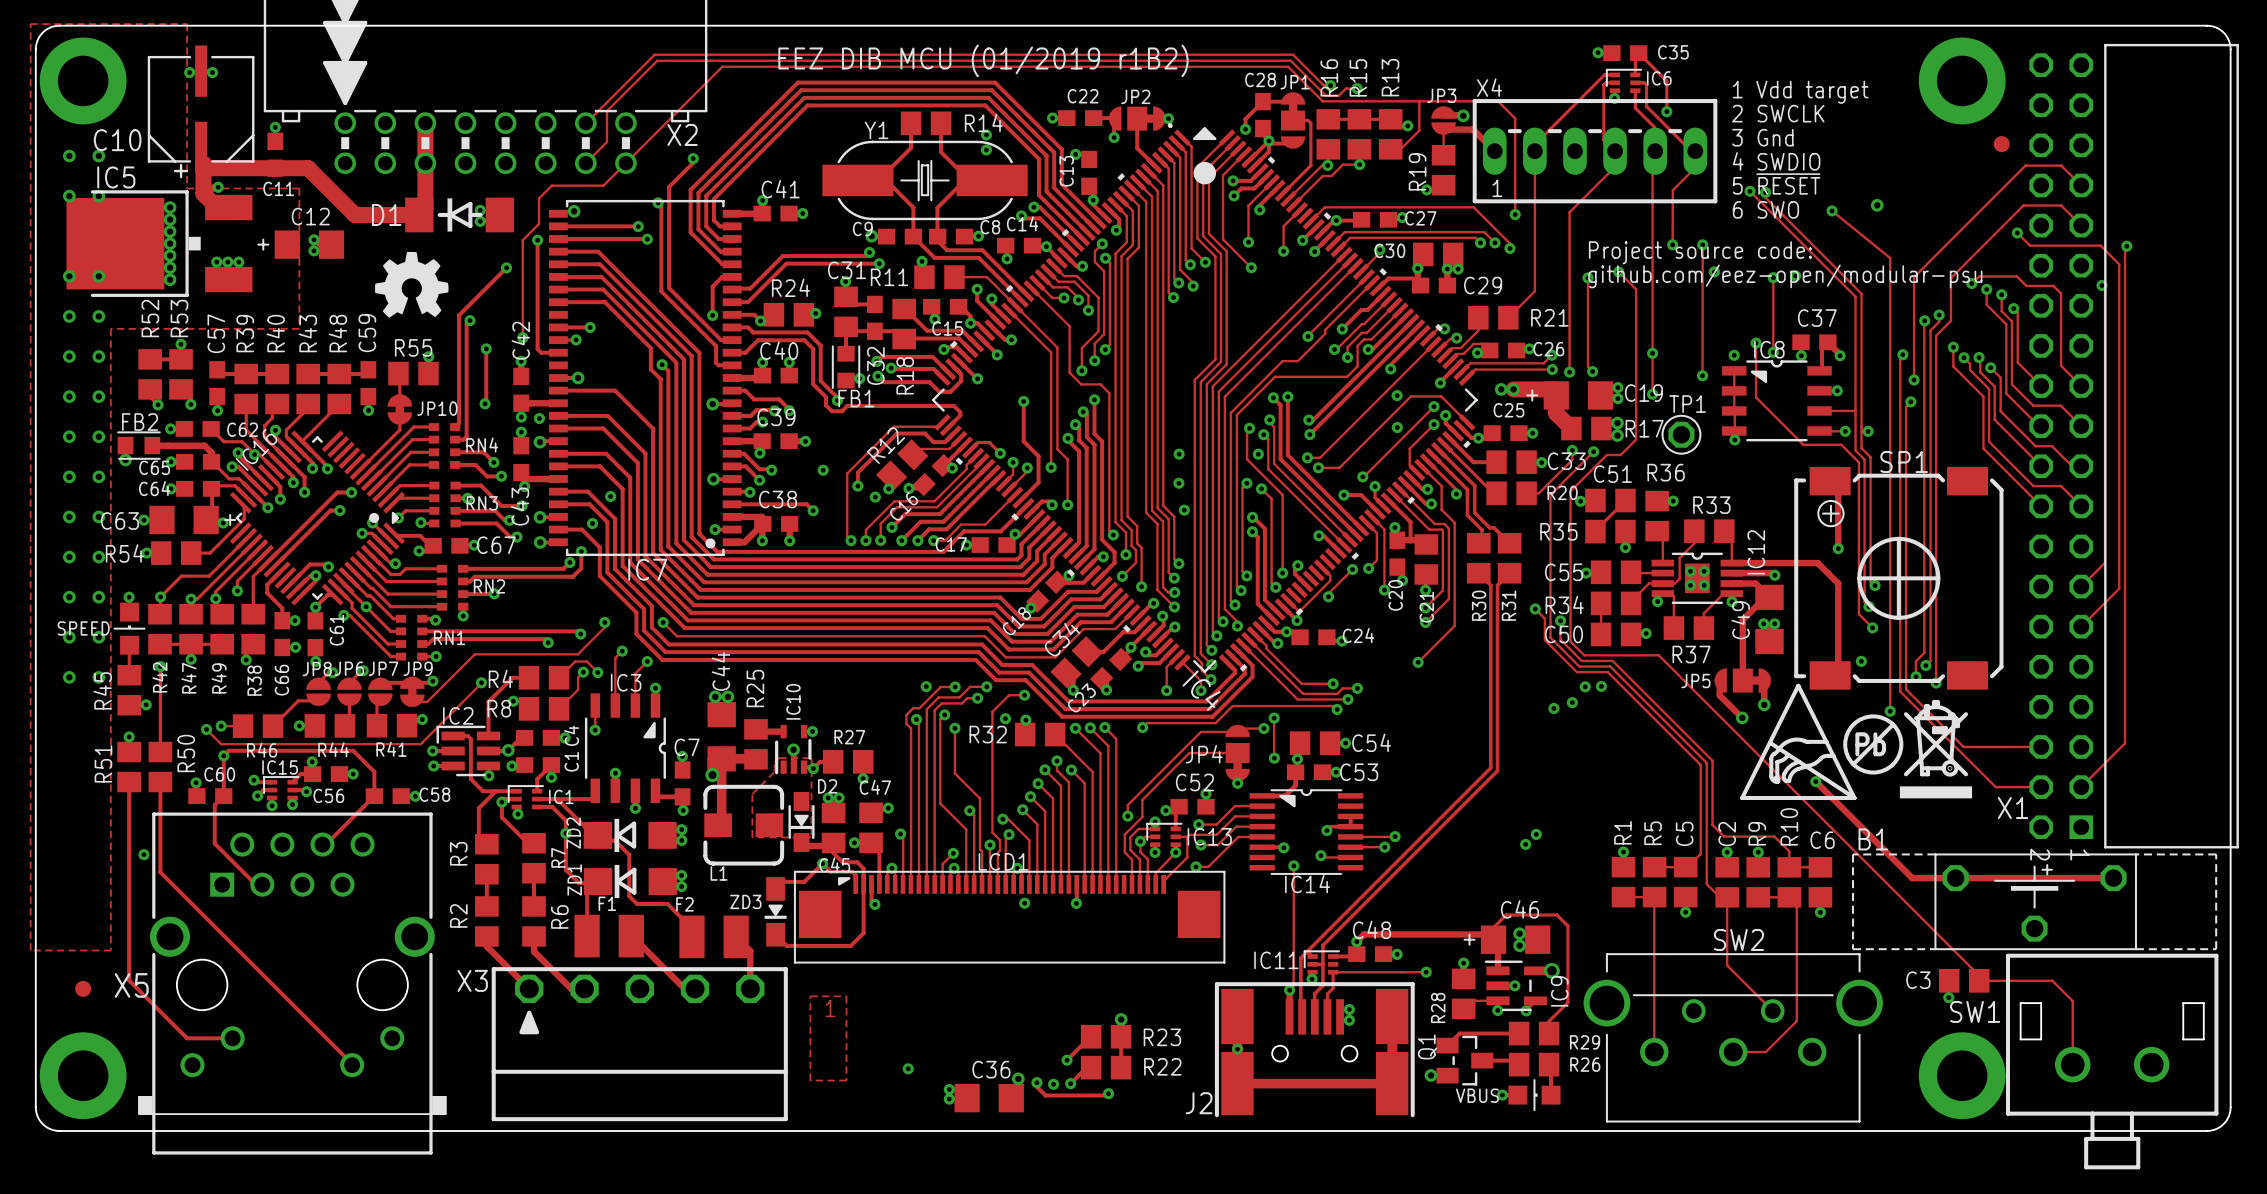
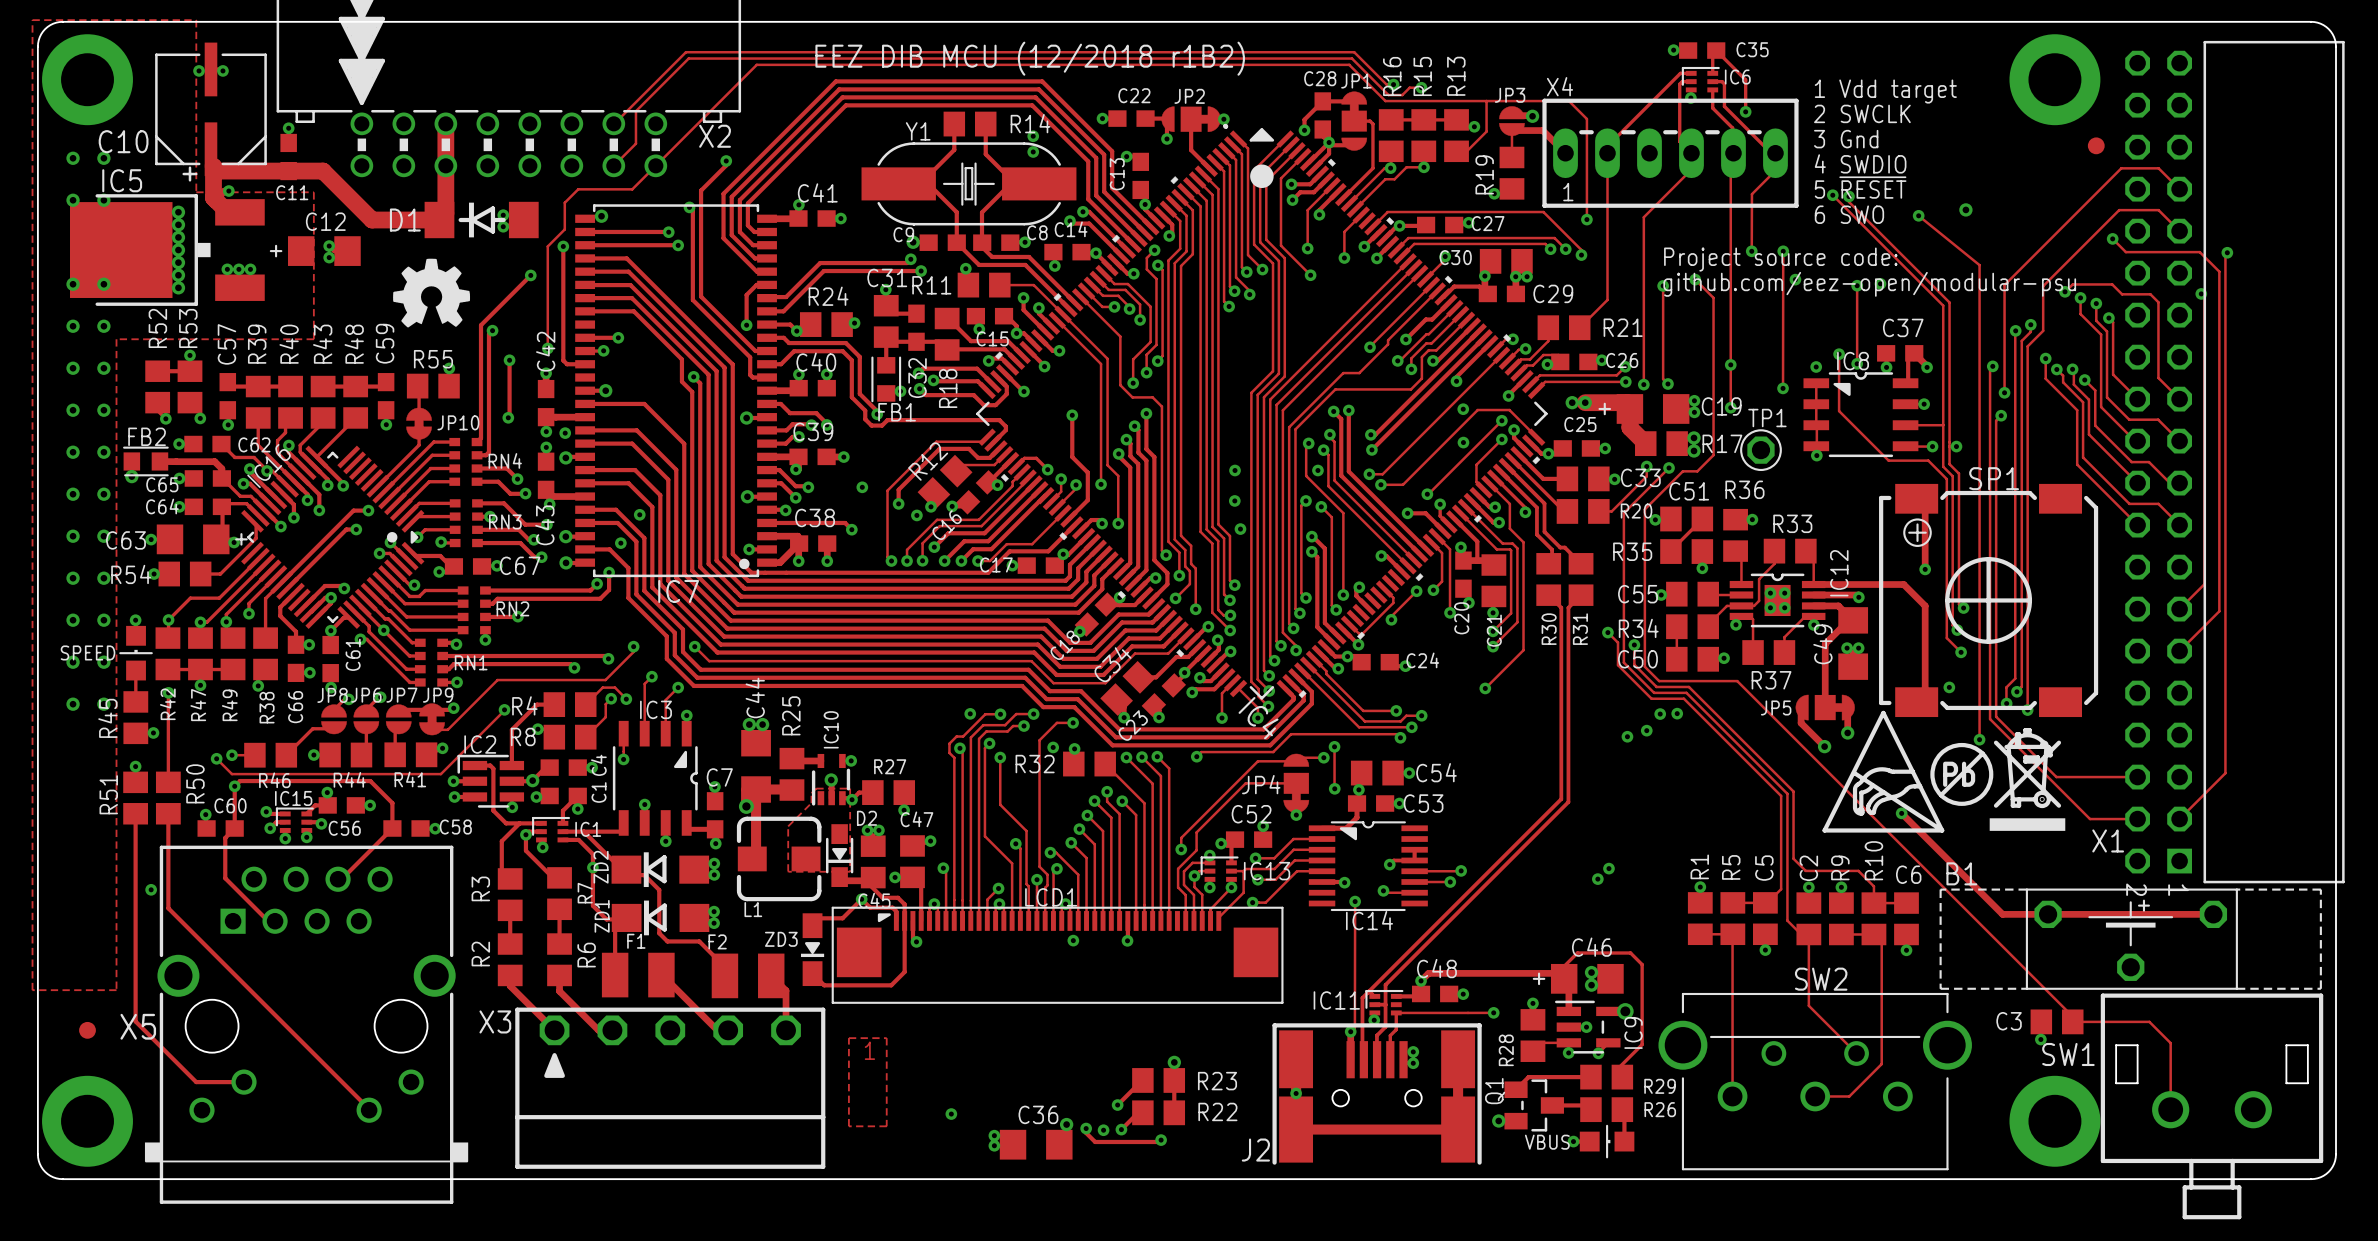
text: EEZ DIB MCU (01/2019 r1B2) (983, 60) -> EEZ DIB MCU (12/2018 r1B2) (1030, 58)

